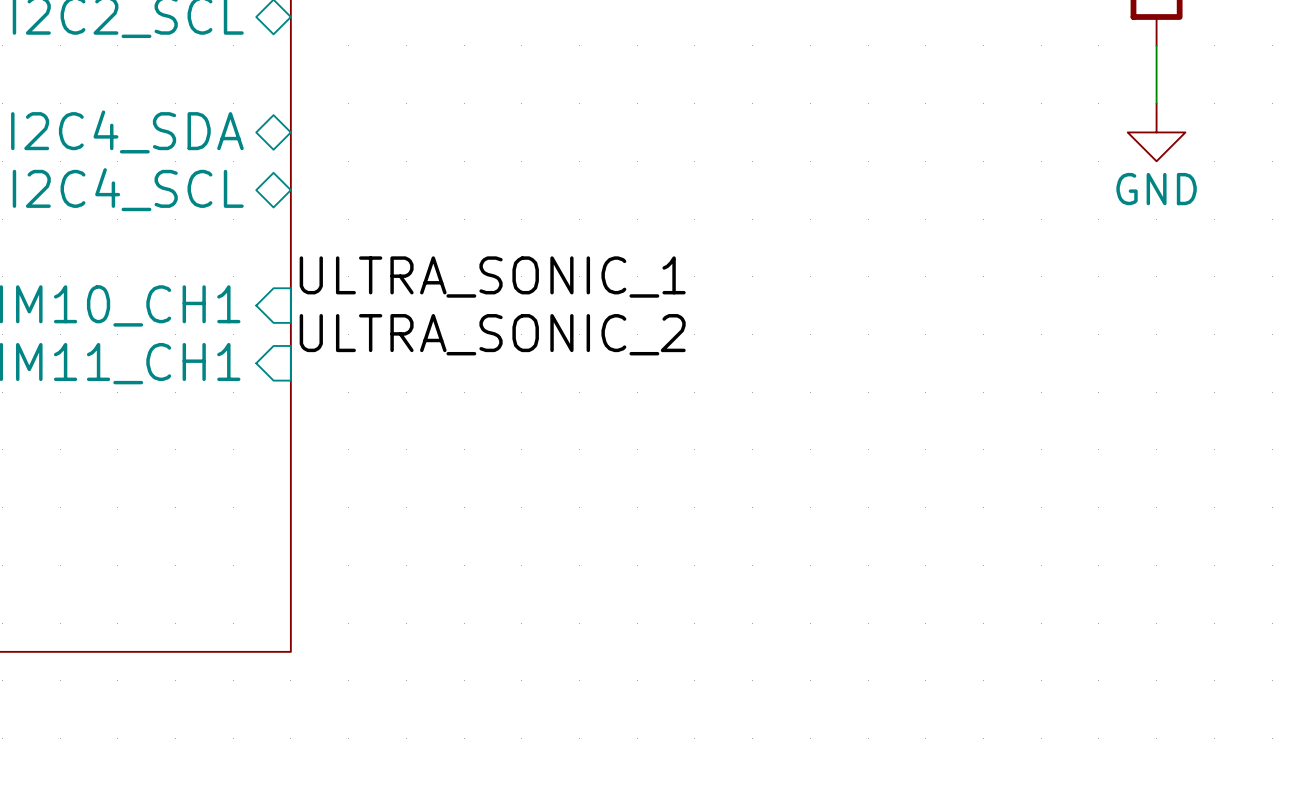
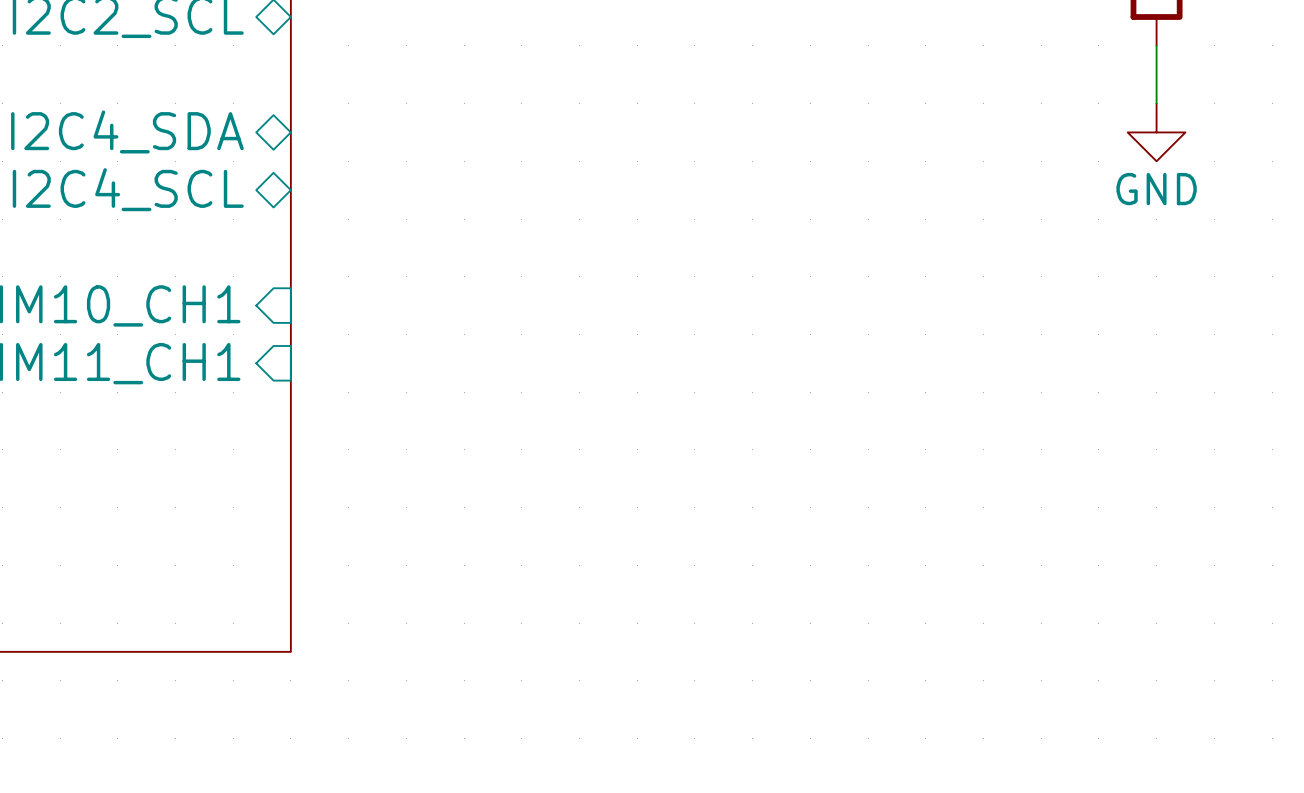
label: ULTRA_SONIC_1 (492, 277) -> none
label: ULTRA_SONIC_2 (492, 334) -> none

